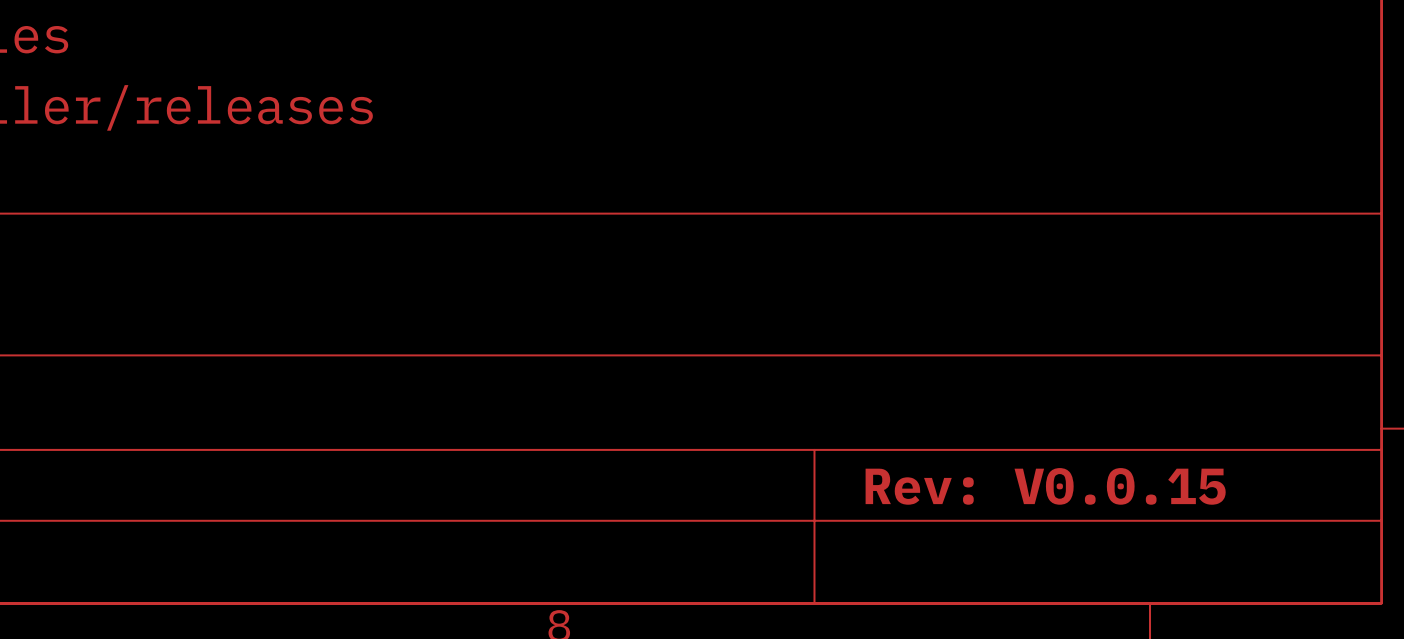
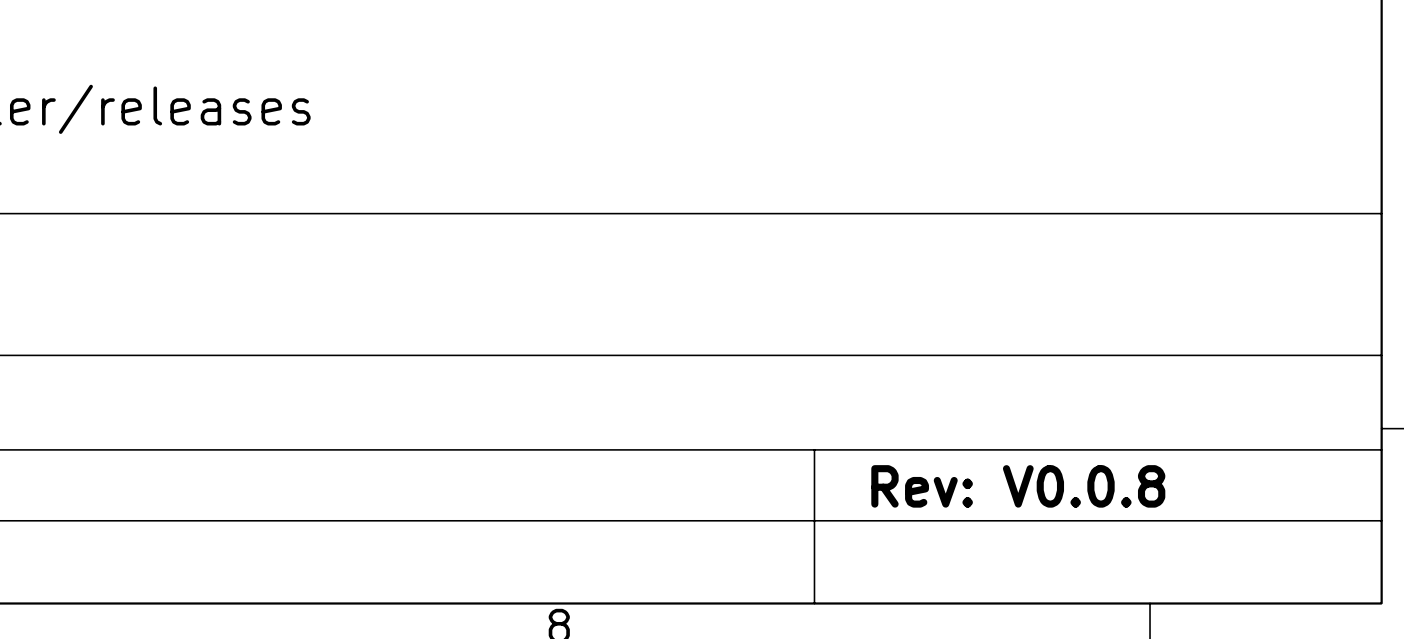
title block: Rev: V0.0.15 (1045, 486) -> Rev: V0.0.8 (1018, 486)

